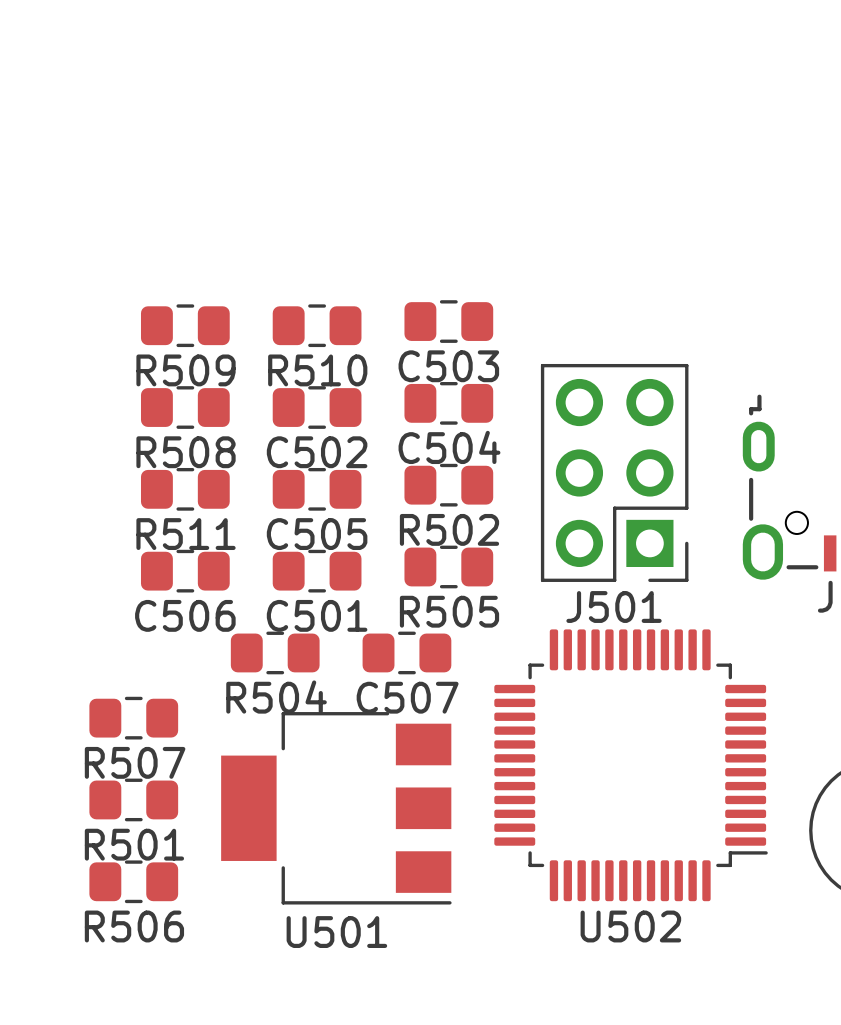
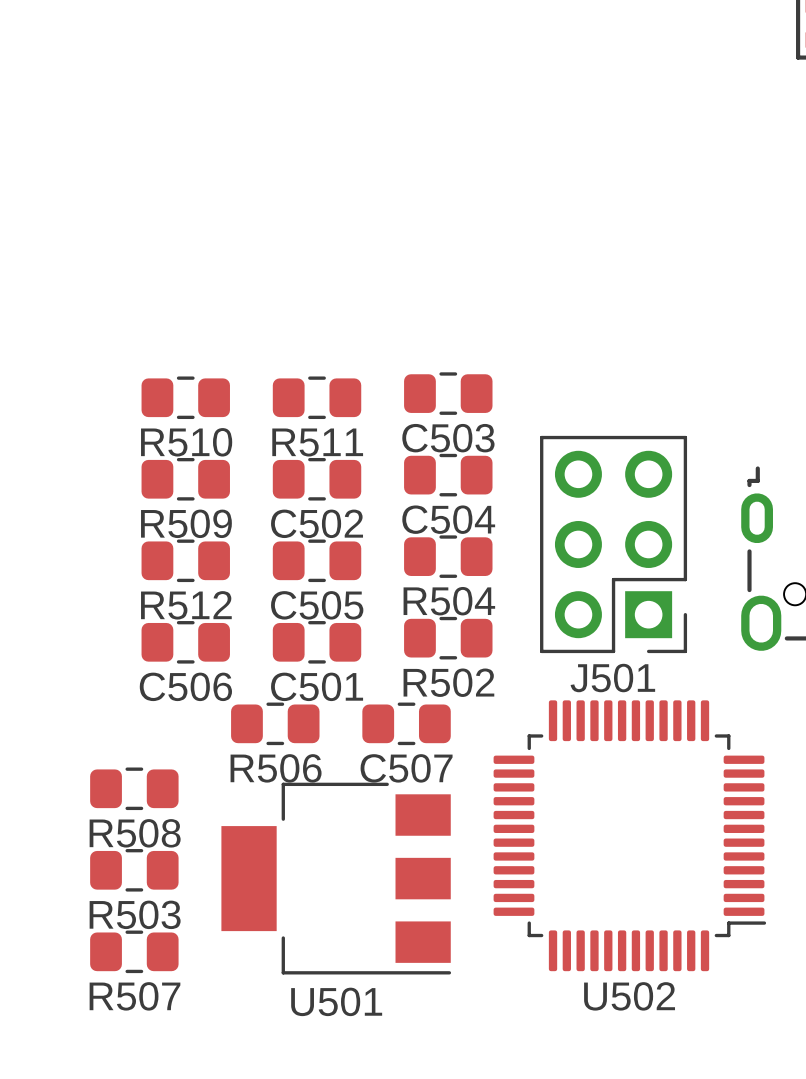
R509 name: R509 (186, 370) -> R510 (186, 442)
R510 name: R510 (317, 370) -> R511 (317, 442)
R508 name: R508 (186, 452) -> R509 (186, 523)
R502 name: R502 (449, 529) -> R504 (449, 601)
R511 name: R511 (186, 534) -> R512 (186, 605)
R505 name: R505 (449, 611) -> R502 (448, 682)
R504 name: R504 (276, 697) -> R506 (276, 768)
R507 name: R507 (135, 762) -> R508 (135, 833)
R501 name: R501 (134, 844) -> R503 (135, 914)
R506 name: R506 (134, 926) -> R507 (134, 996)

